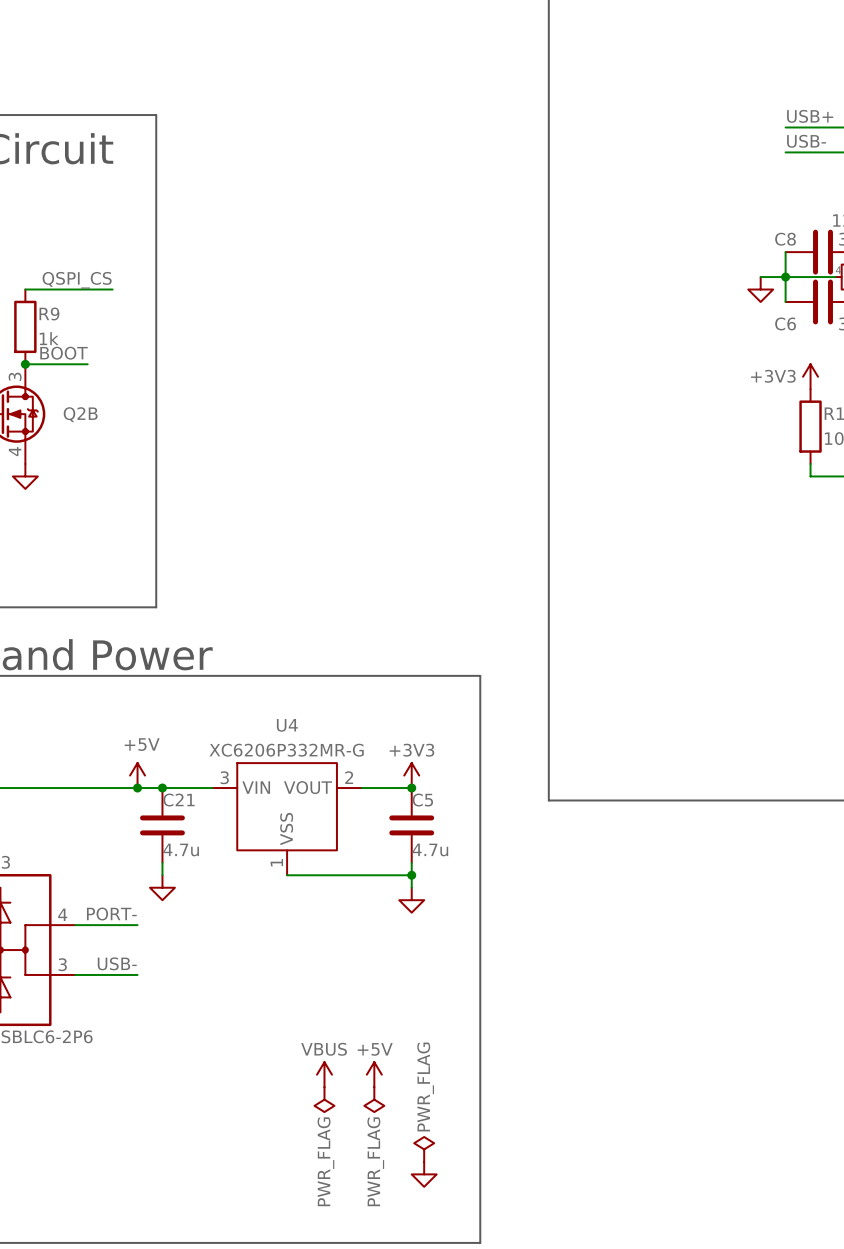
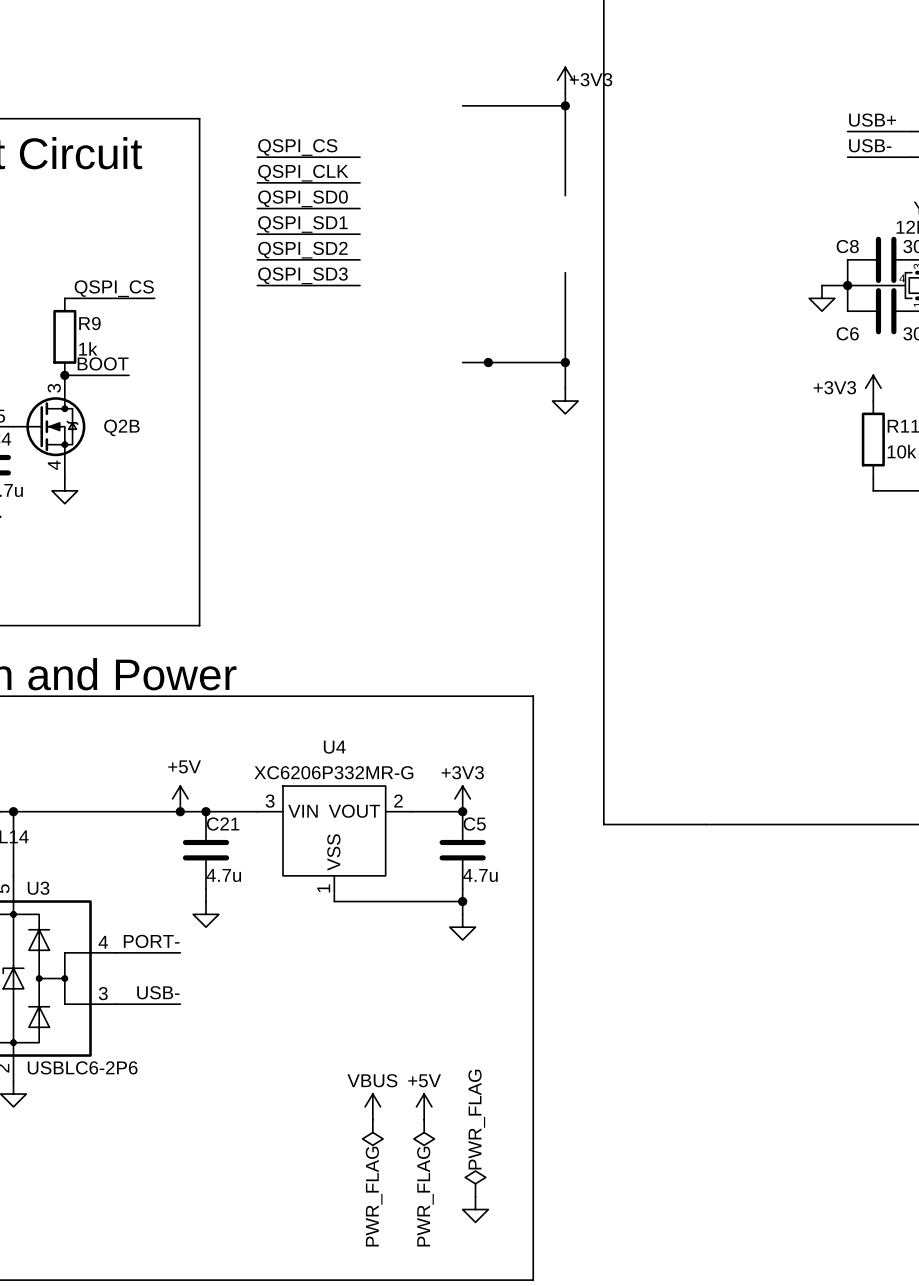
power symbol: none -> +3V3 (565, 80)
wire: none -> (565, 93) (565, 195)
wire: none -> (462, 105) (565, 105)
junction: none -> (565, 105)
label: none -> QSPI_CS (297, 147)
wire: none -> (257, 157) (360, 157)
label: none -> QSPI_CLK (303, 173)
wire: none -> (257, 182) (360, 182)
label: none -> QSPI_SD0 (303, 198)
wire: none -> (257, 208) (360, 208)
label: none -> QSPI_SD1 (302, 224)
wire: none -> (257, 234) (360, 234)
label: none -> QSPI_SD2 (302, 250)
wire: none -> (257, 259) (360, 259)
wire: none -> (565, 272) (565, 388)
label: none -> QSPI_SD3 (302, 275)
wire: none -> (257, 285) (360, 285)
wire: none -> (462, 362) (565, 362)
junction: none -> (488, 362)
junction: none -> (565, 362)
power symbol: none -> (565, 401)

